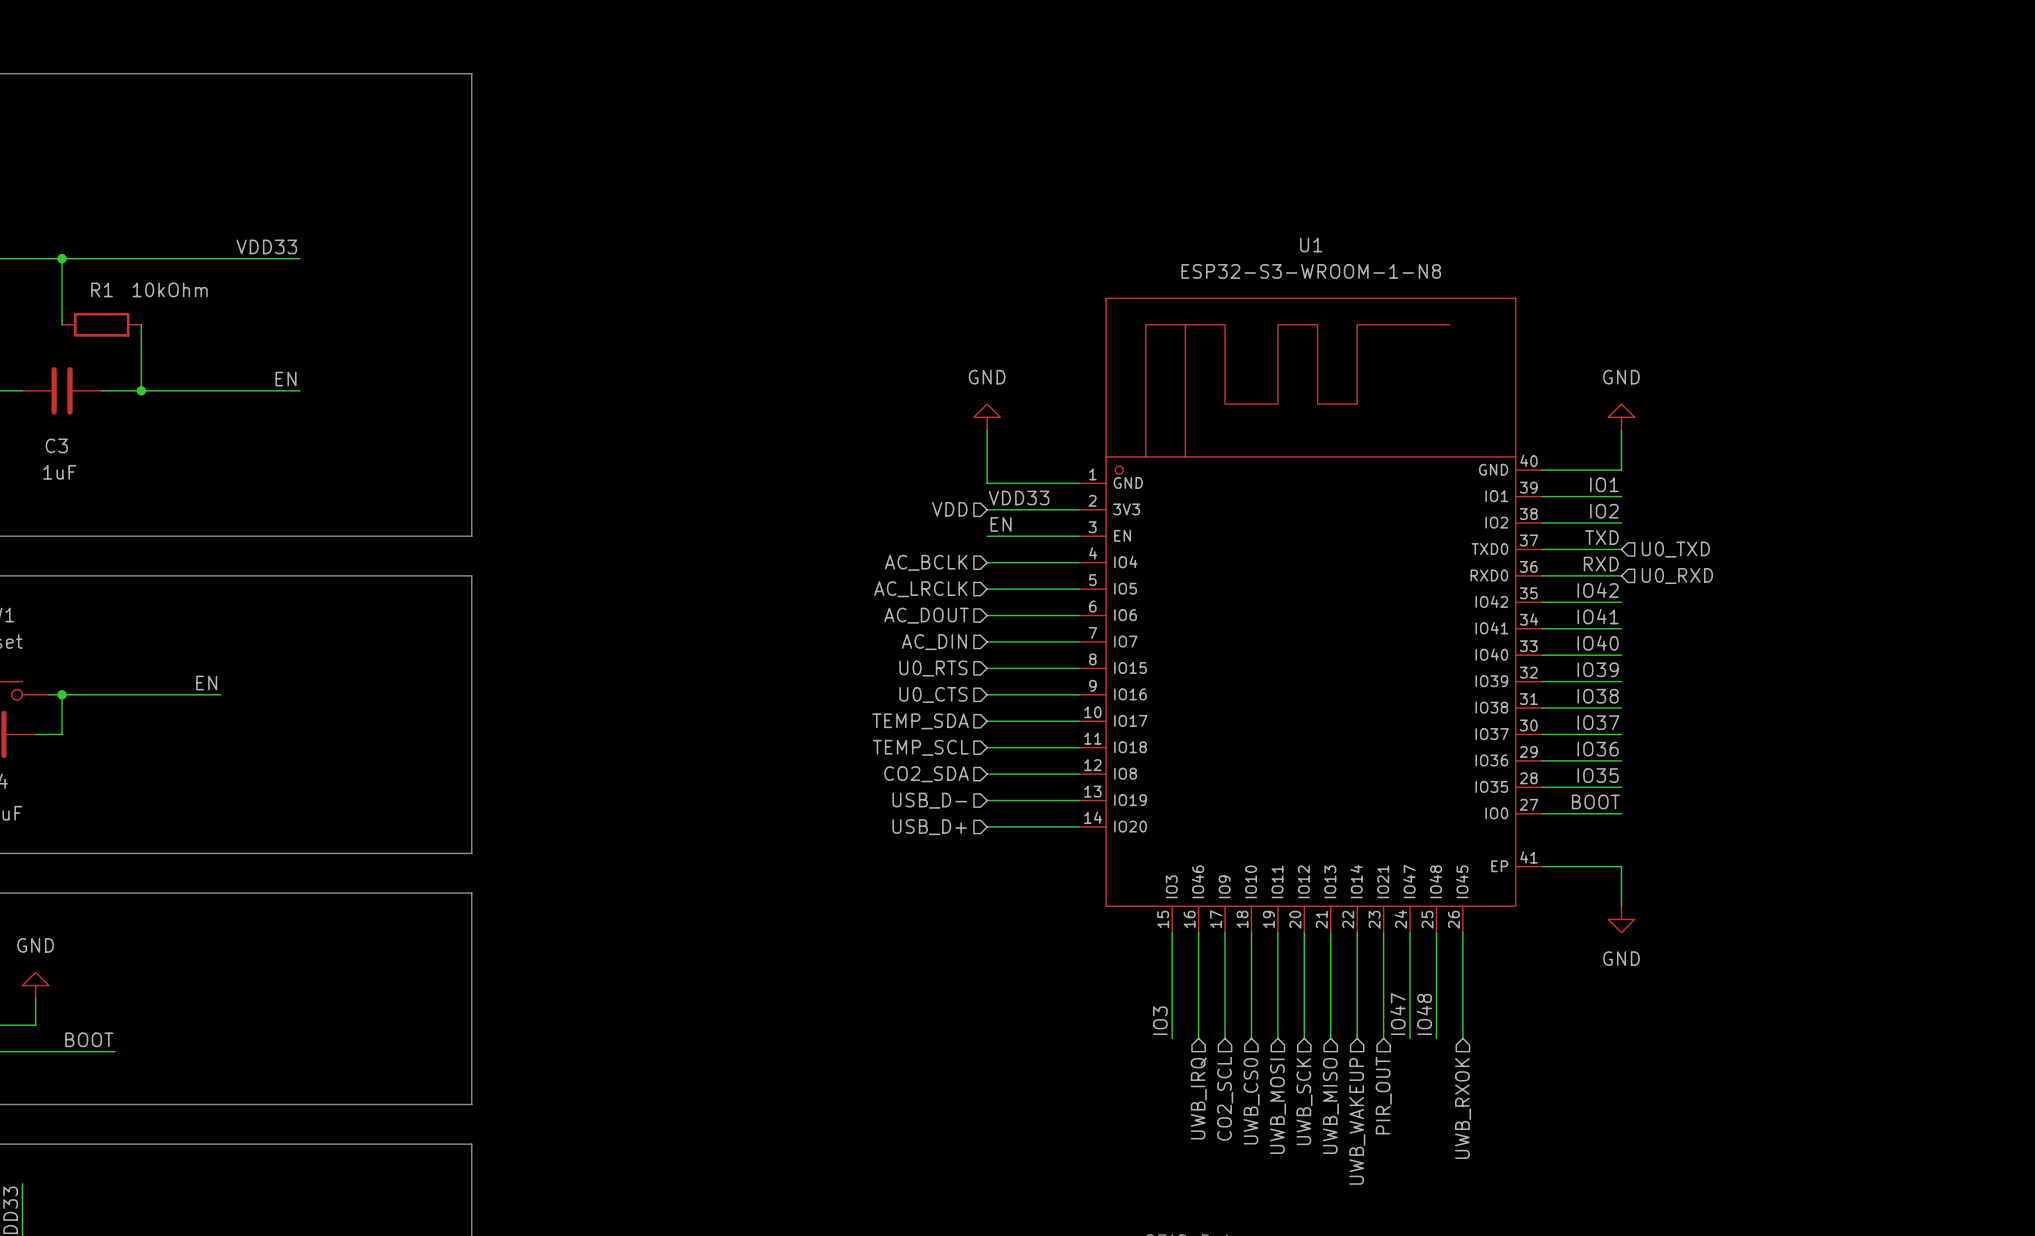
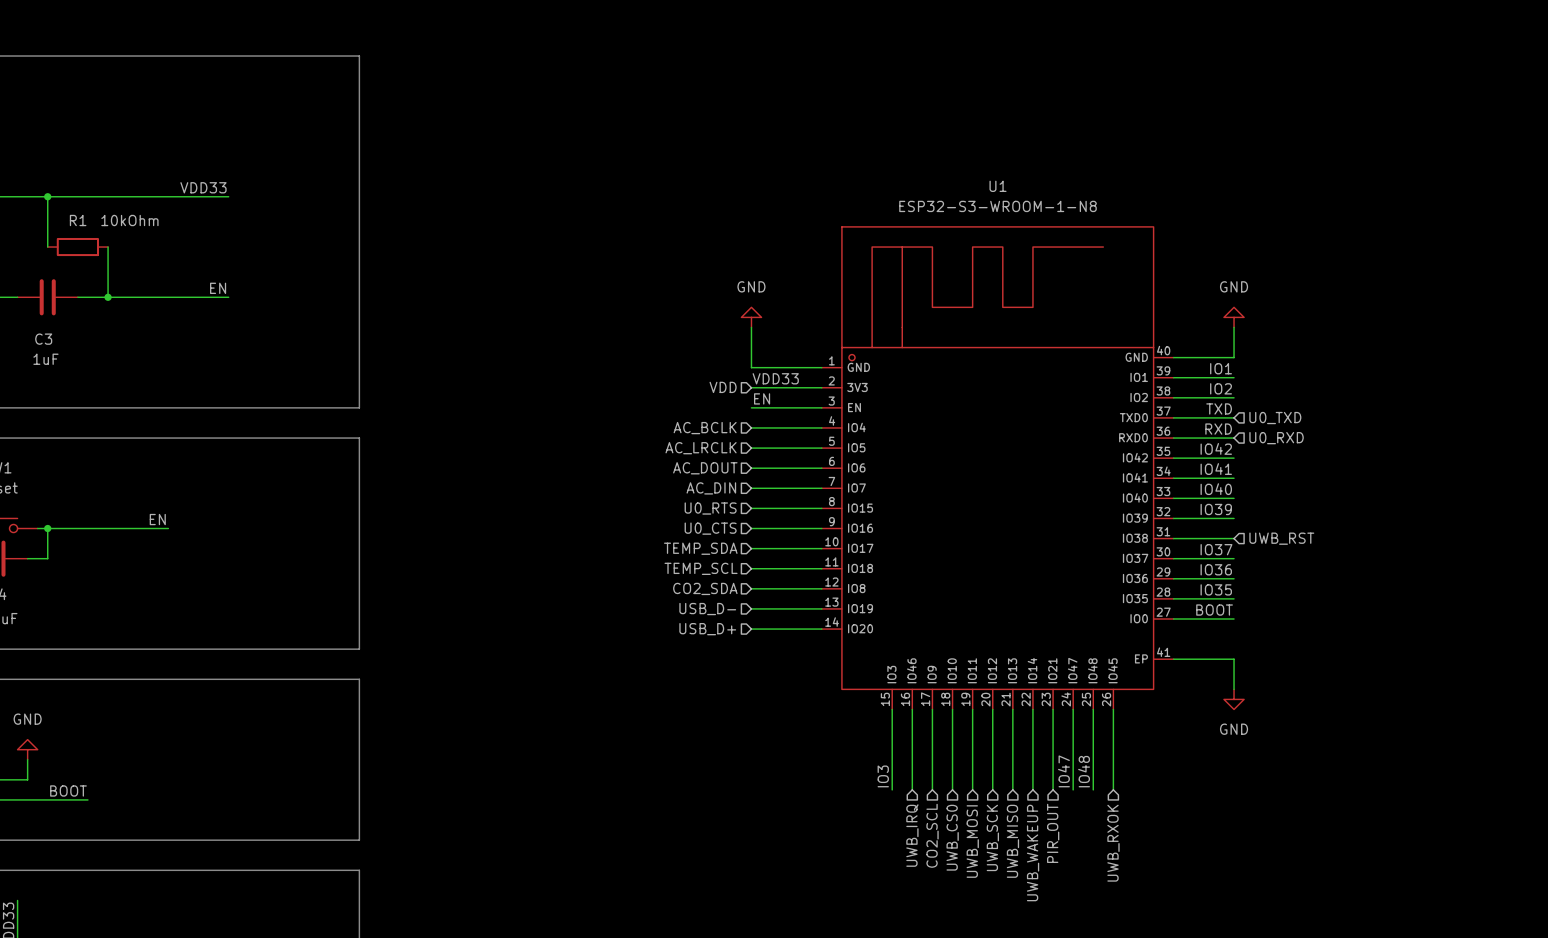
label: IO38 (1598, 696) -> none
hierarchical label: none -> UWB_RST (1281, 538)

